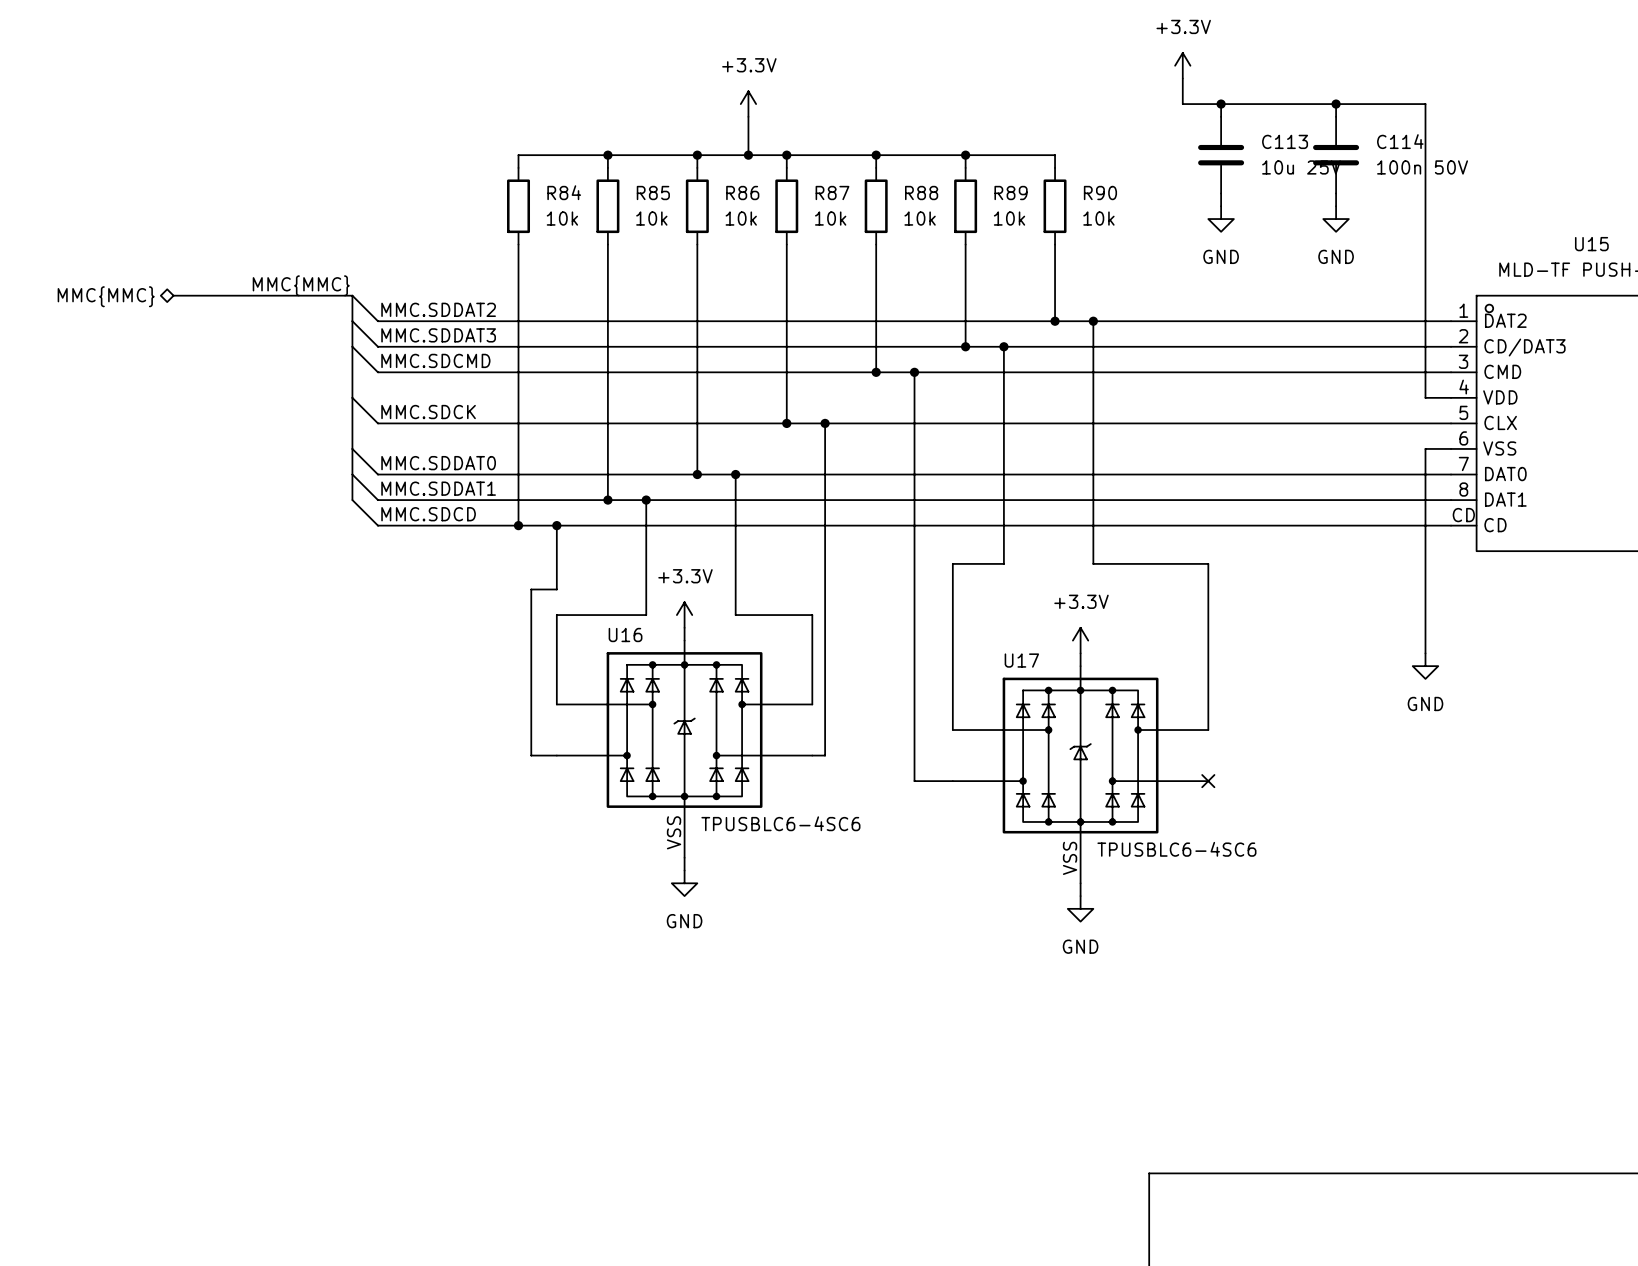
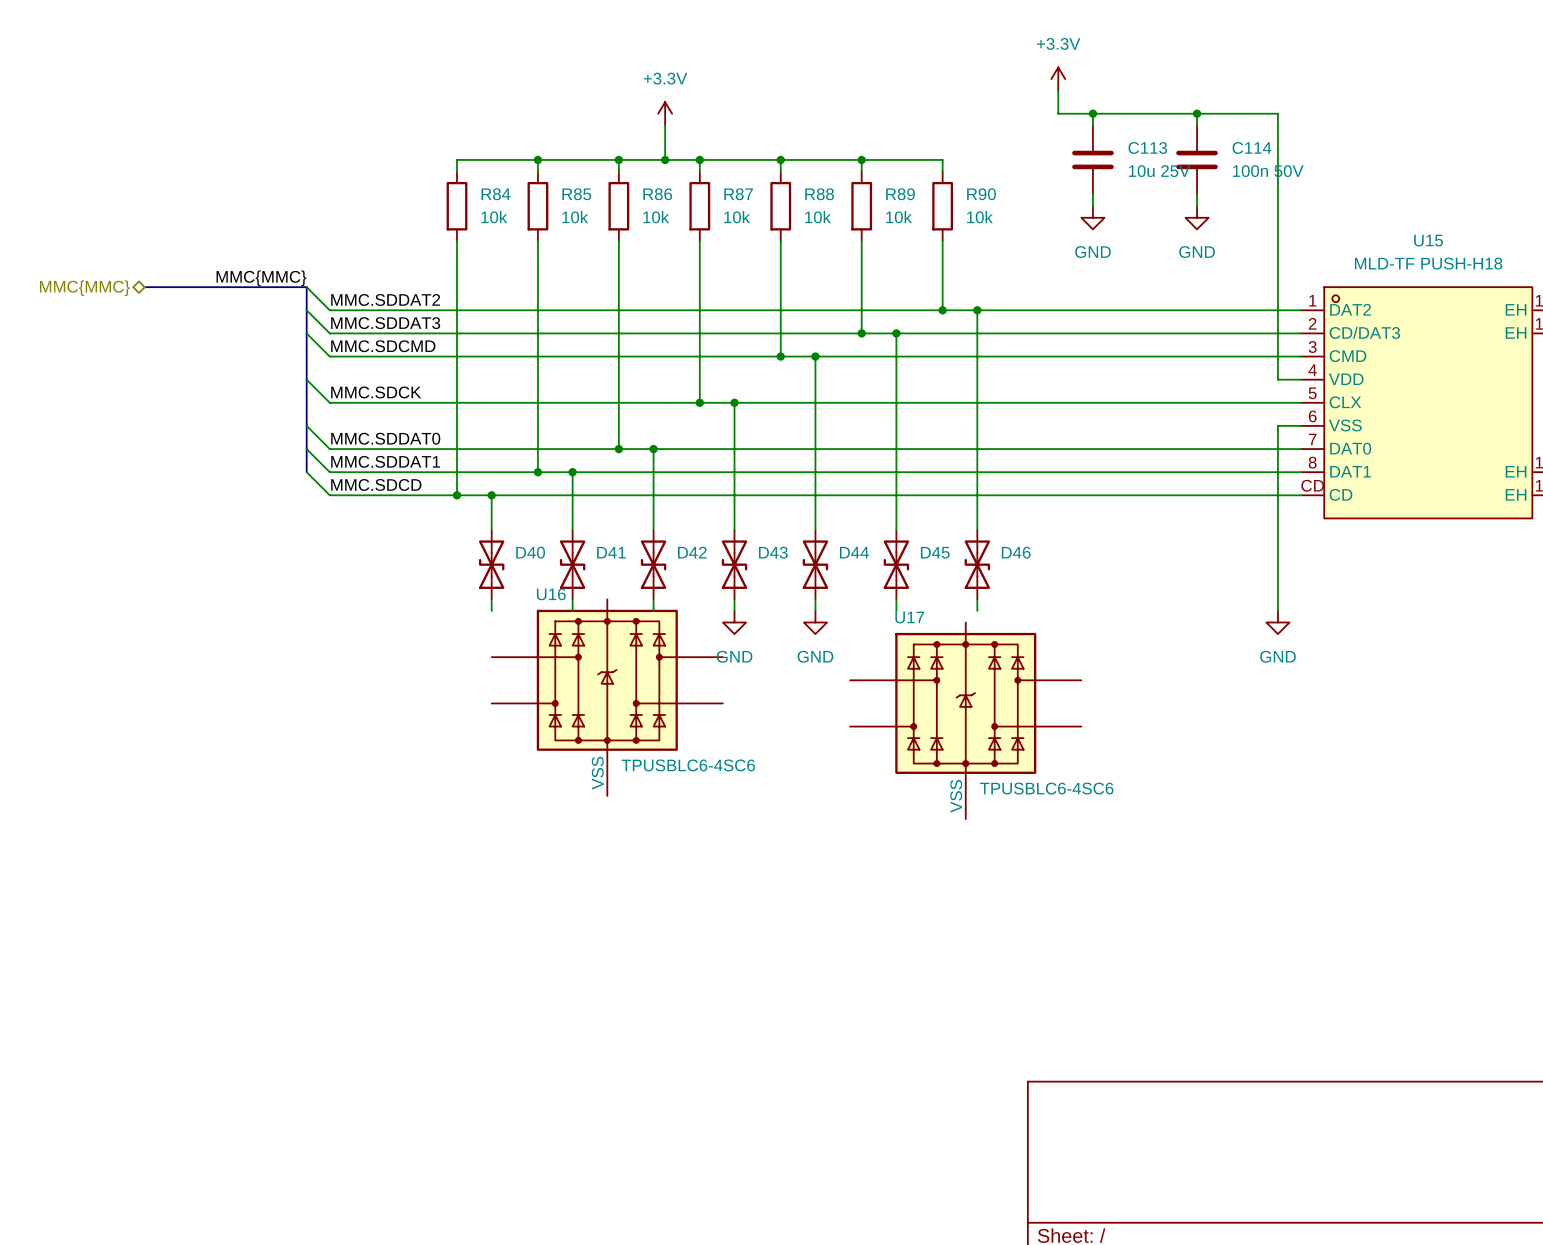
wire: (556, 563) (556, 589) (531, 589) (531, 755) (556, 755) -> none
wire: (646, 563) (646, 615) (556, 615) (556, 640) -> none
wire: (735, 563) (735, 615) (812, 615) (812, 704) -> none
wire: (1003, 563) (952, 563) (952, 730) -> none
wire: (1093, 563) (1208, 563) (1208, 730) -> none
D40: none -> (491, 564)
D41: none -> (572, 564)
D42: none -> (653, 564)
D43: none -> (734, 564)
D44: none -> (815, 564)
D45: none -> (896, 564)
D46: none -> (977, 564)
power symbol: +3.3V (684, 615) -> none
wire: (684, 627) (684, 640) -> (572, 599) (572, 610)
wire: none -> (896, 599) (896, 610)
power symbol: +3.3V (1080, 640) -> none
wire: (556, 653) (556, 704) -> none
wire: (825, 653) (825, 755) (812, 755) -> none
wire: (914, 653) (914, 781) (952, 781) -> none
wire: (1080, 653) (1080, 666) -> (977, 599) (977, 610)
power symbol: none -> GND (734, 622)
power symbol: none -> GND (815, 622)
no-connect mark: (1208, 781) -> none
wire: (684, 857) (684, 870) -> (653, 599) (653, 610)
power symbol: GND (684, 883) -> none
wire: (1080, 883) (1080, 896) -> none
power symbol: GND (1080, 908) -> none

